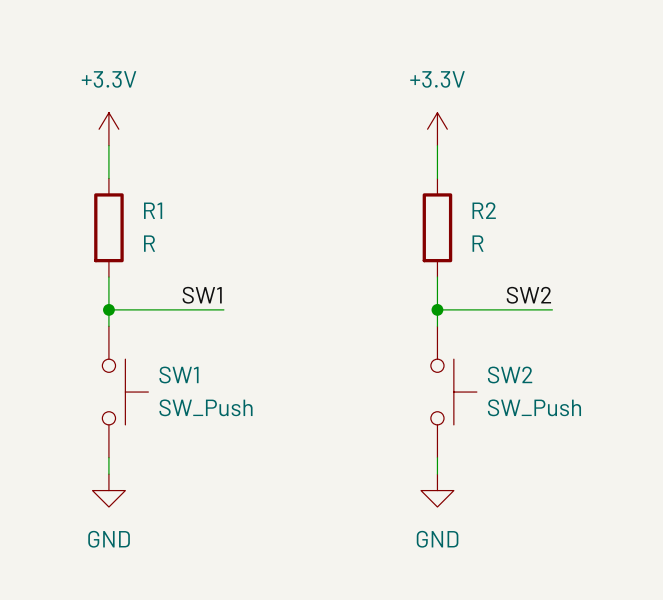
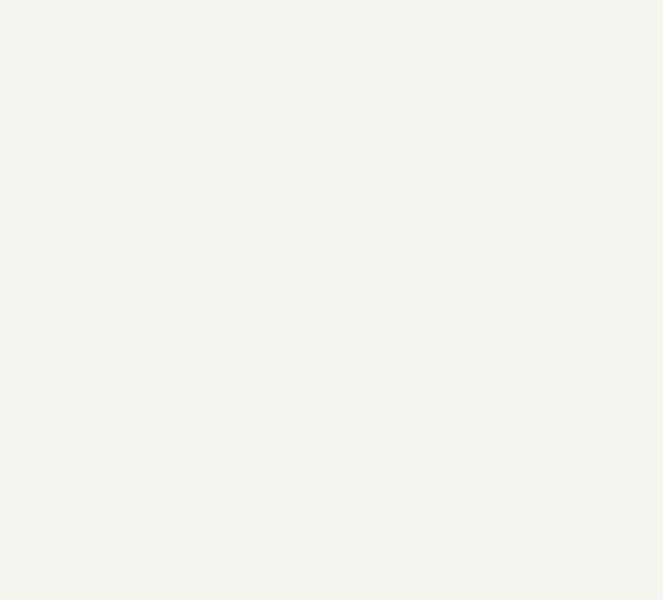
power symbol: +3.3V (108, 129) -> none
power symbol: +3.3V (437, 129) -> none
wire: (108, 145) (108, 178) -> none
wire: (437, 145) (437, 178) -> none
R1: R (108, 227) -> none
R2: R (437, 227) -> none
wire: (108, 277) (108, 326) -> none
wire: (437, 277) (437, 326) -> none
label: SW1 (202, 295) -> none
label: SW2 (528, 295) -> none
wire: (108, 309) (223, 309) -> none
junction: (108, 309) -> none
wire: (437, 309) (552, 309) -> none
junction: (437, 309) -> none
SW1: SW_Push (125, 392) -> none
SW2: SW_Push (453, 392) -> none
wire: (108, 457) (108, 474) -> none
wire: (437, 457) (437, 474) -> none
power symbol: GND (108, 490) -> none
power symbol: GND (437, 490) -> none

